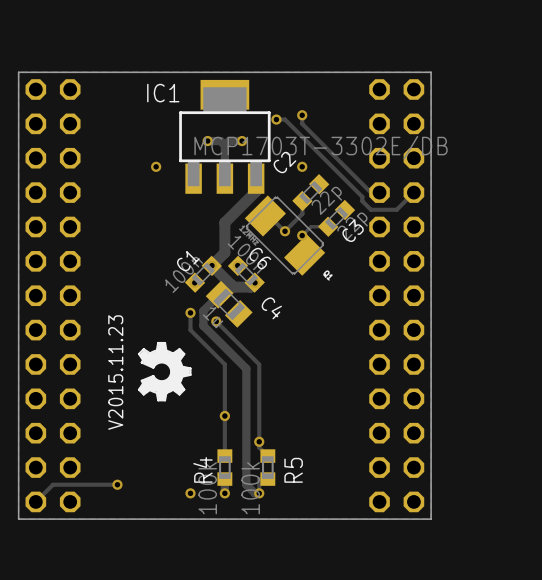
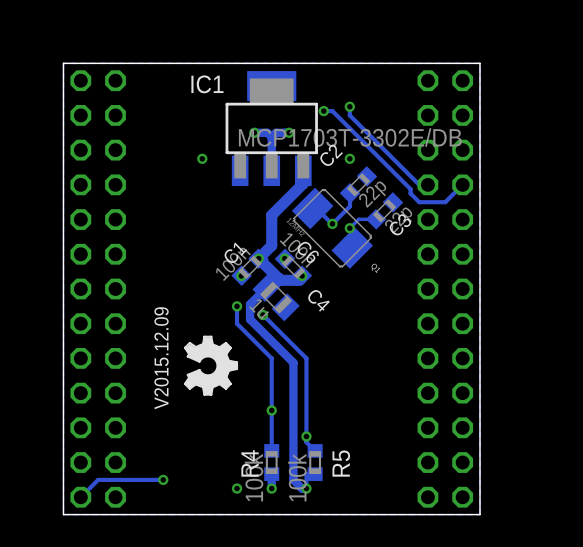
text: V2015.11.23 (115, 372) -> V2015.12.09 (161, 358)

